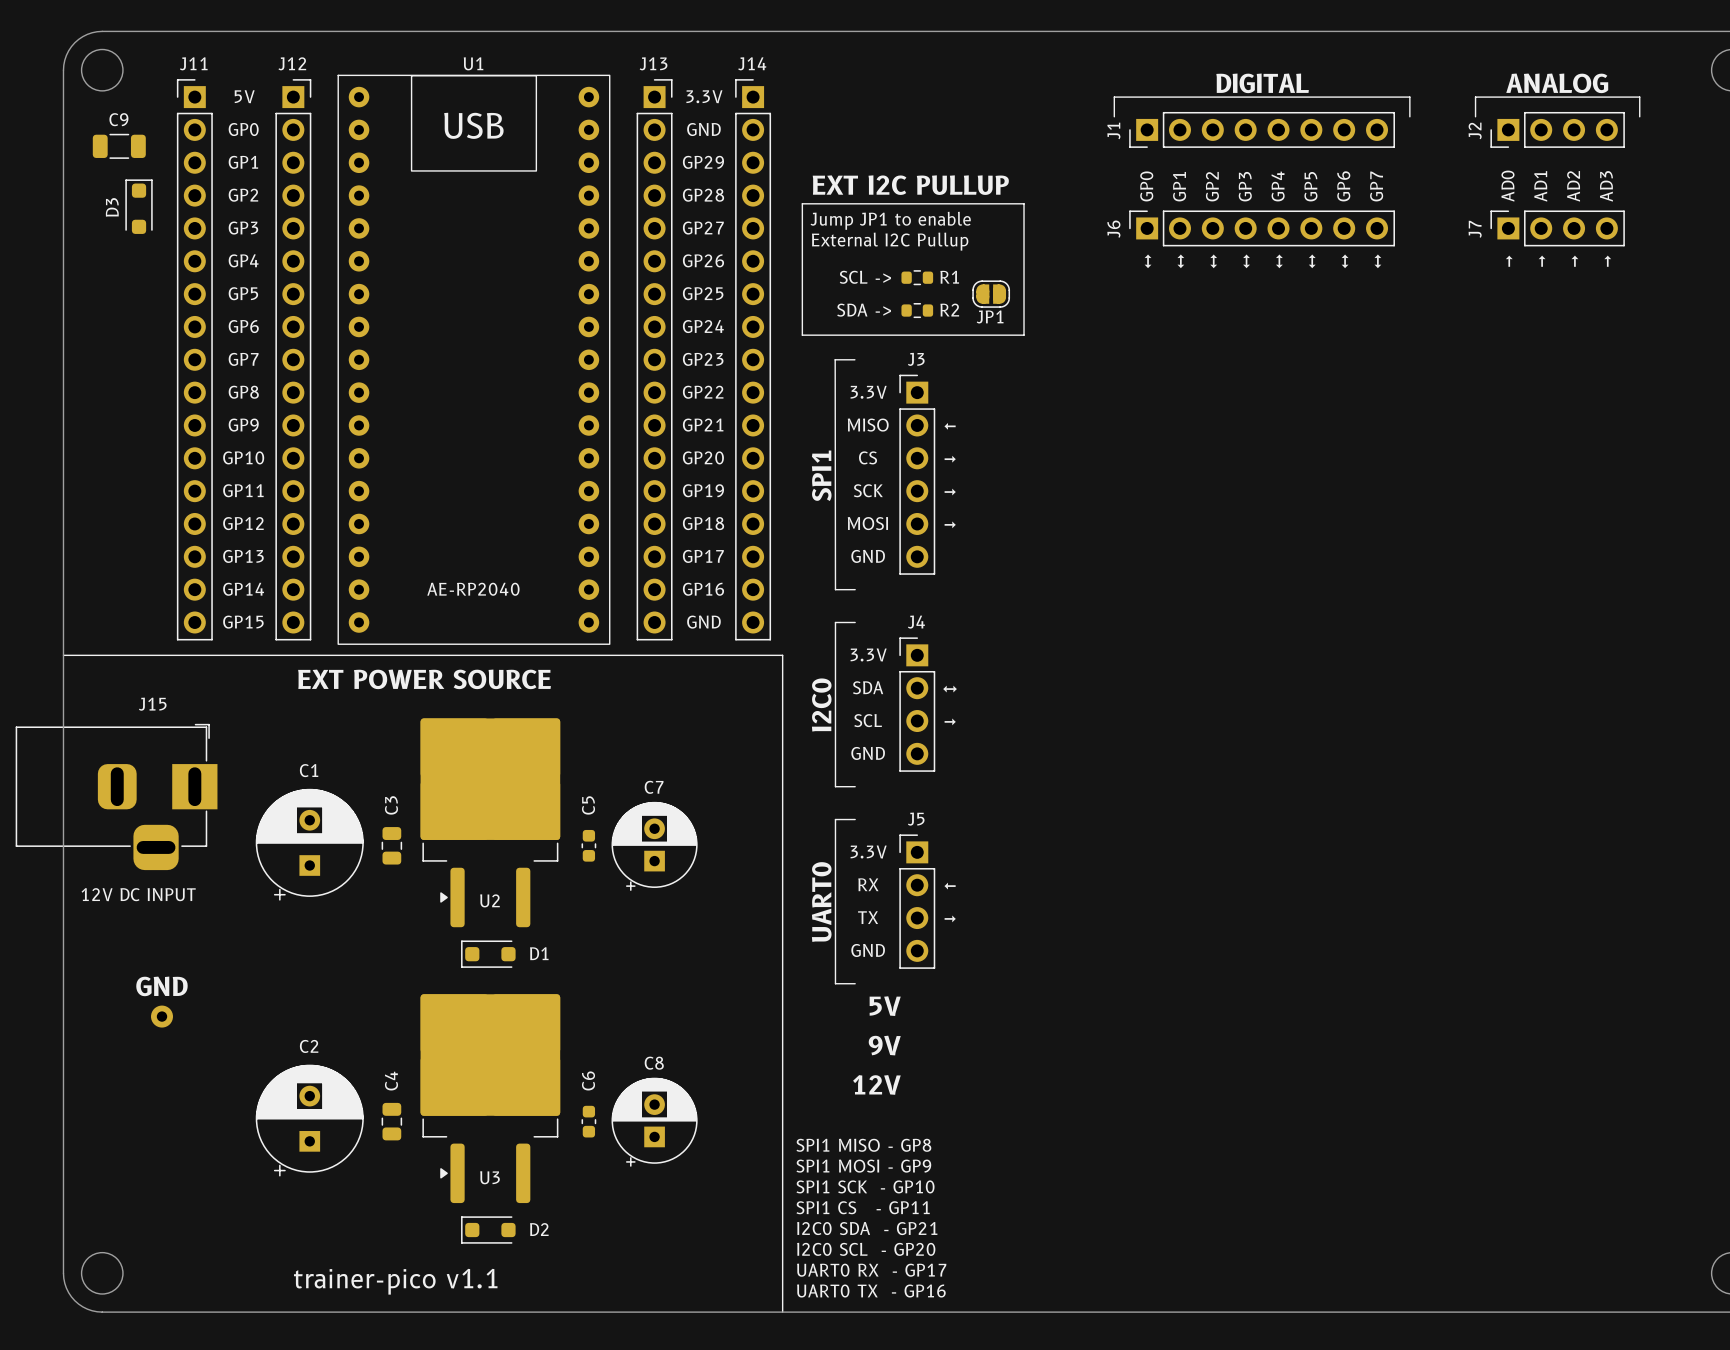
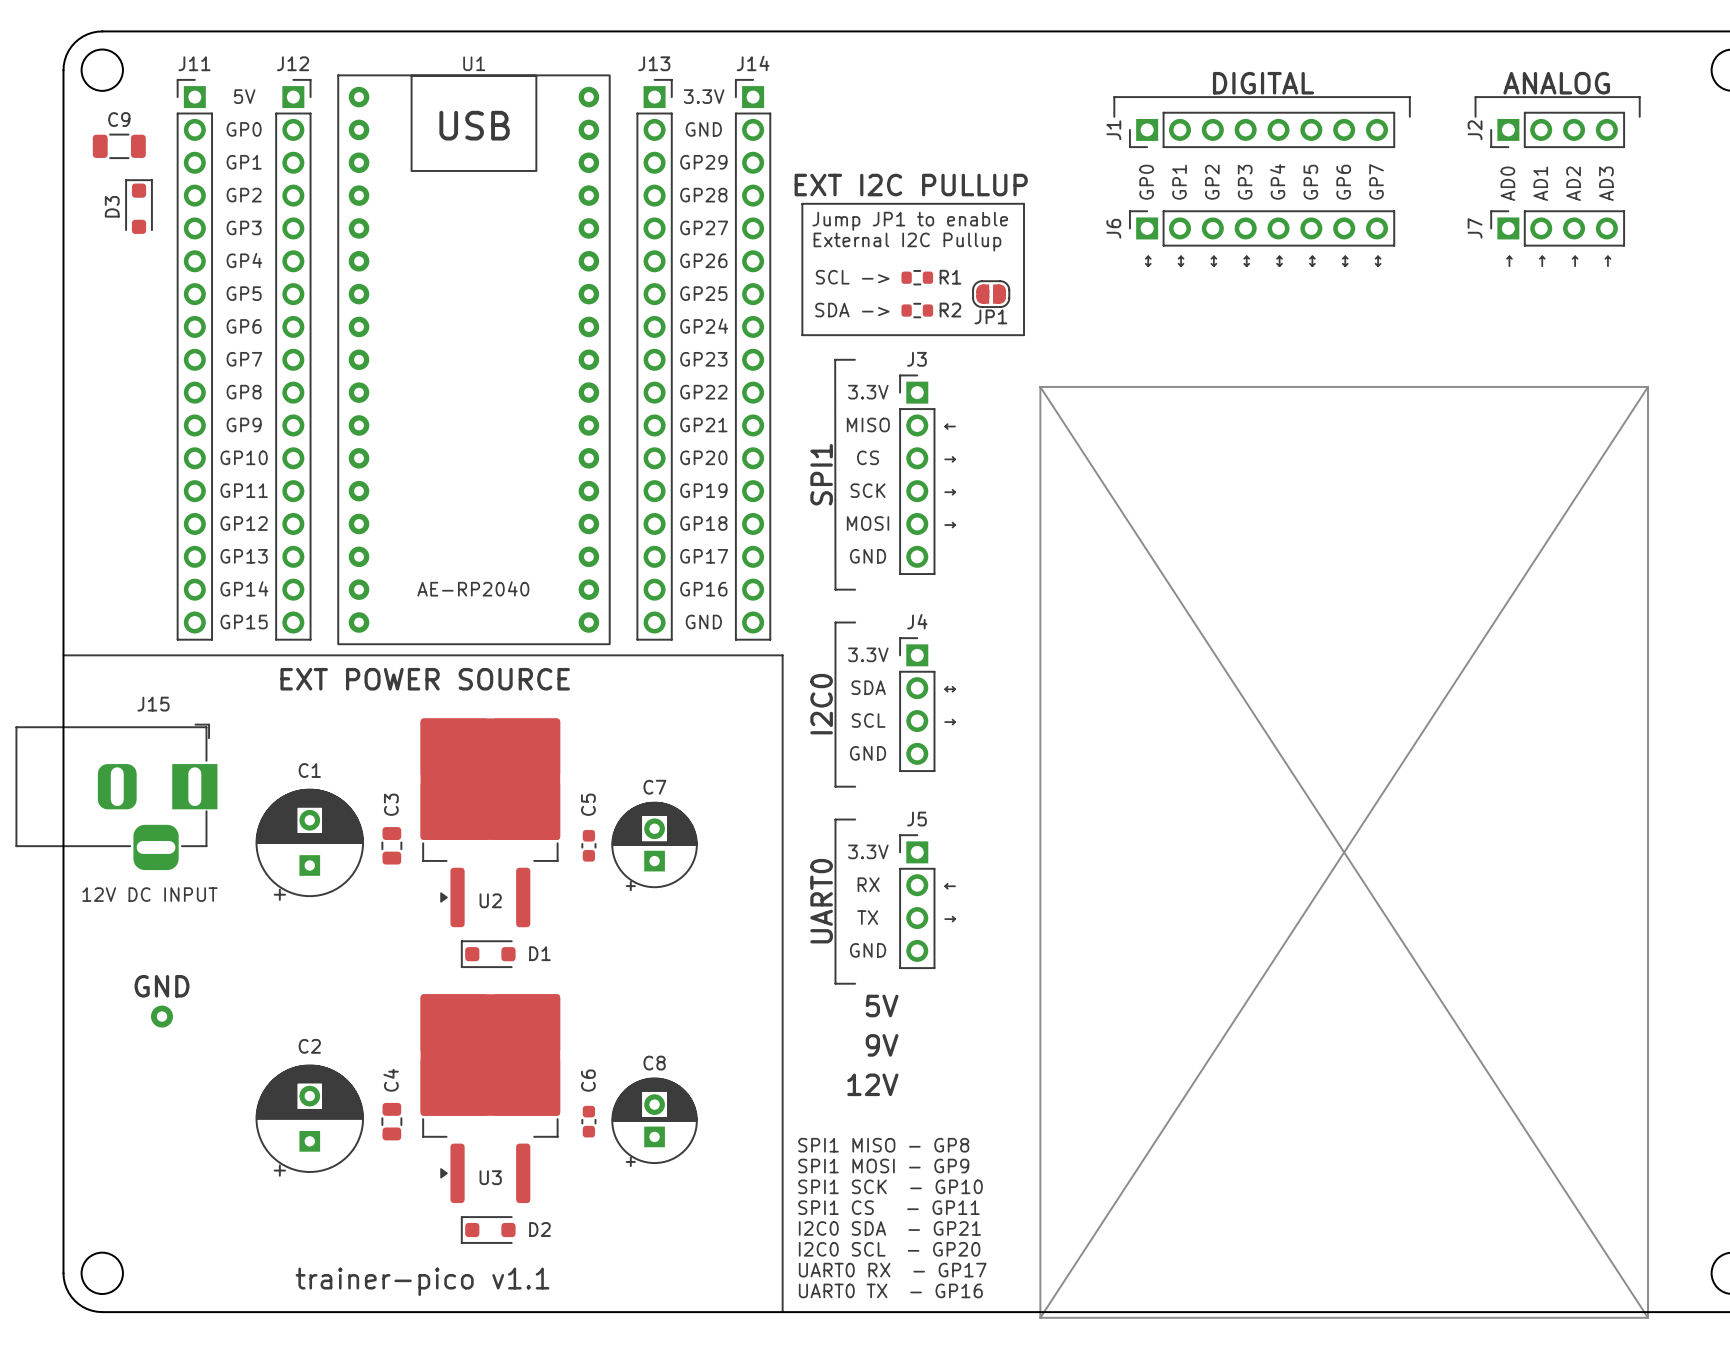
line: none -> (1040, 386) (1648, 1317)
line: none -> (1040, 386) (1648, 386)
line: none -> (1040, 386) (1040, 1317)
line: none -> (1648, 386) (1040, 1317)
line: none -> (1648, 386) (1648, 1317)
line: none -> (1040, 1317) (1648, 1317)

